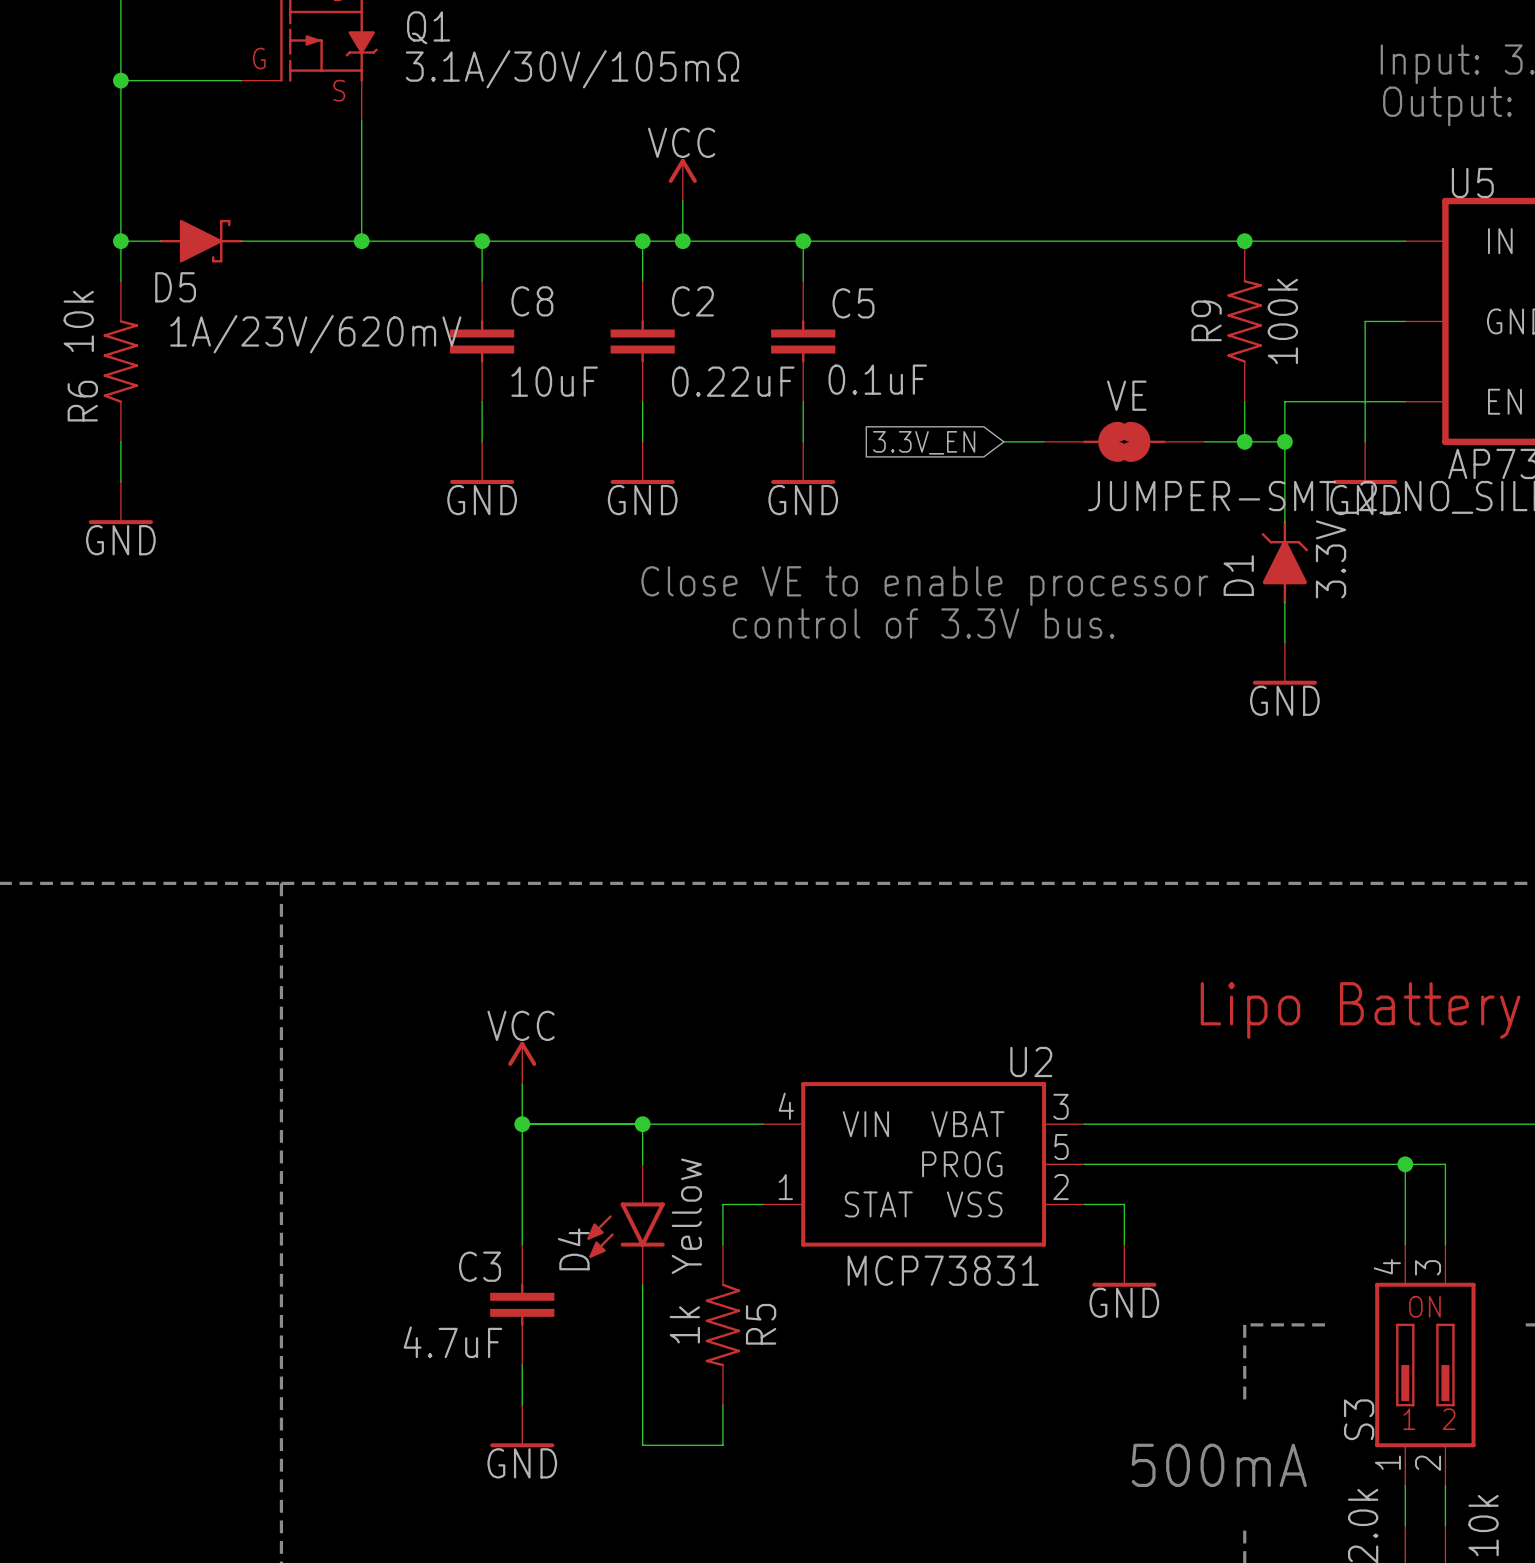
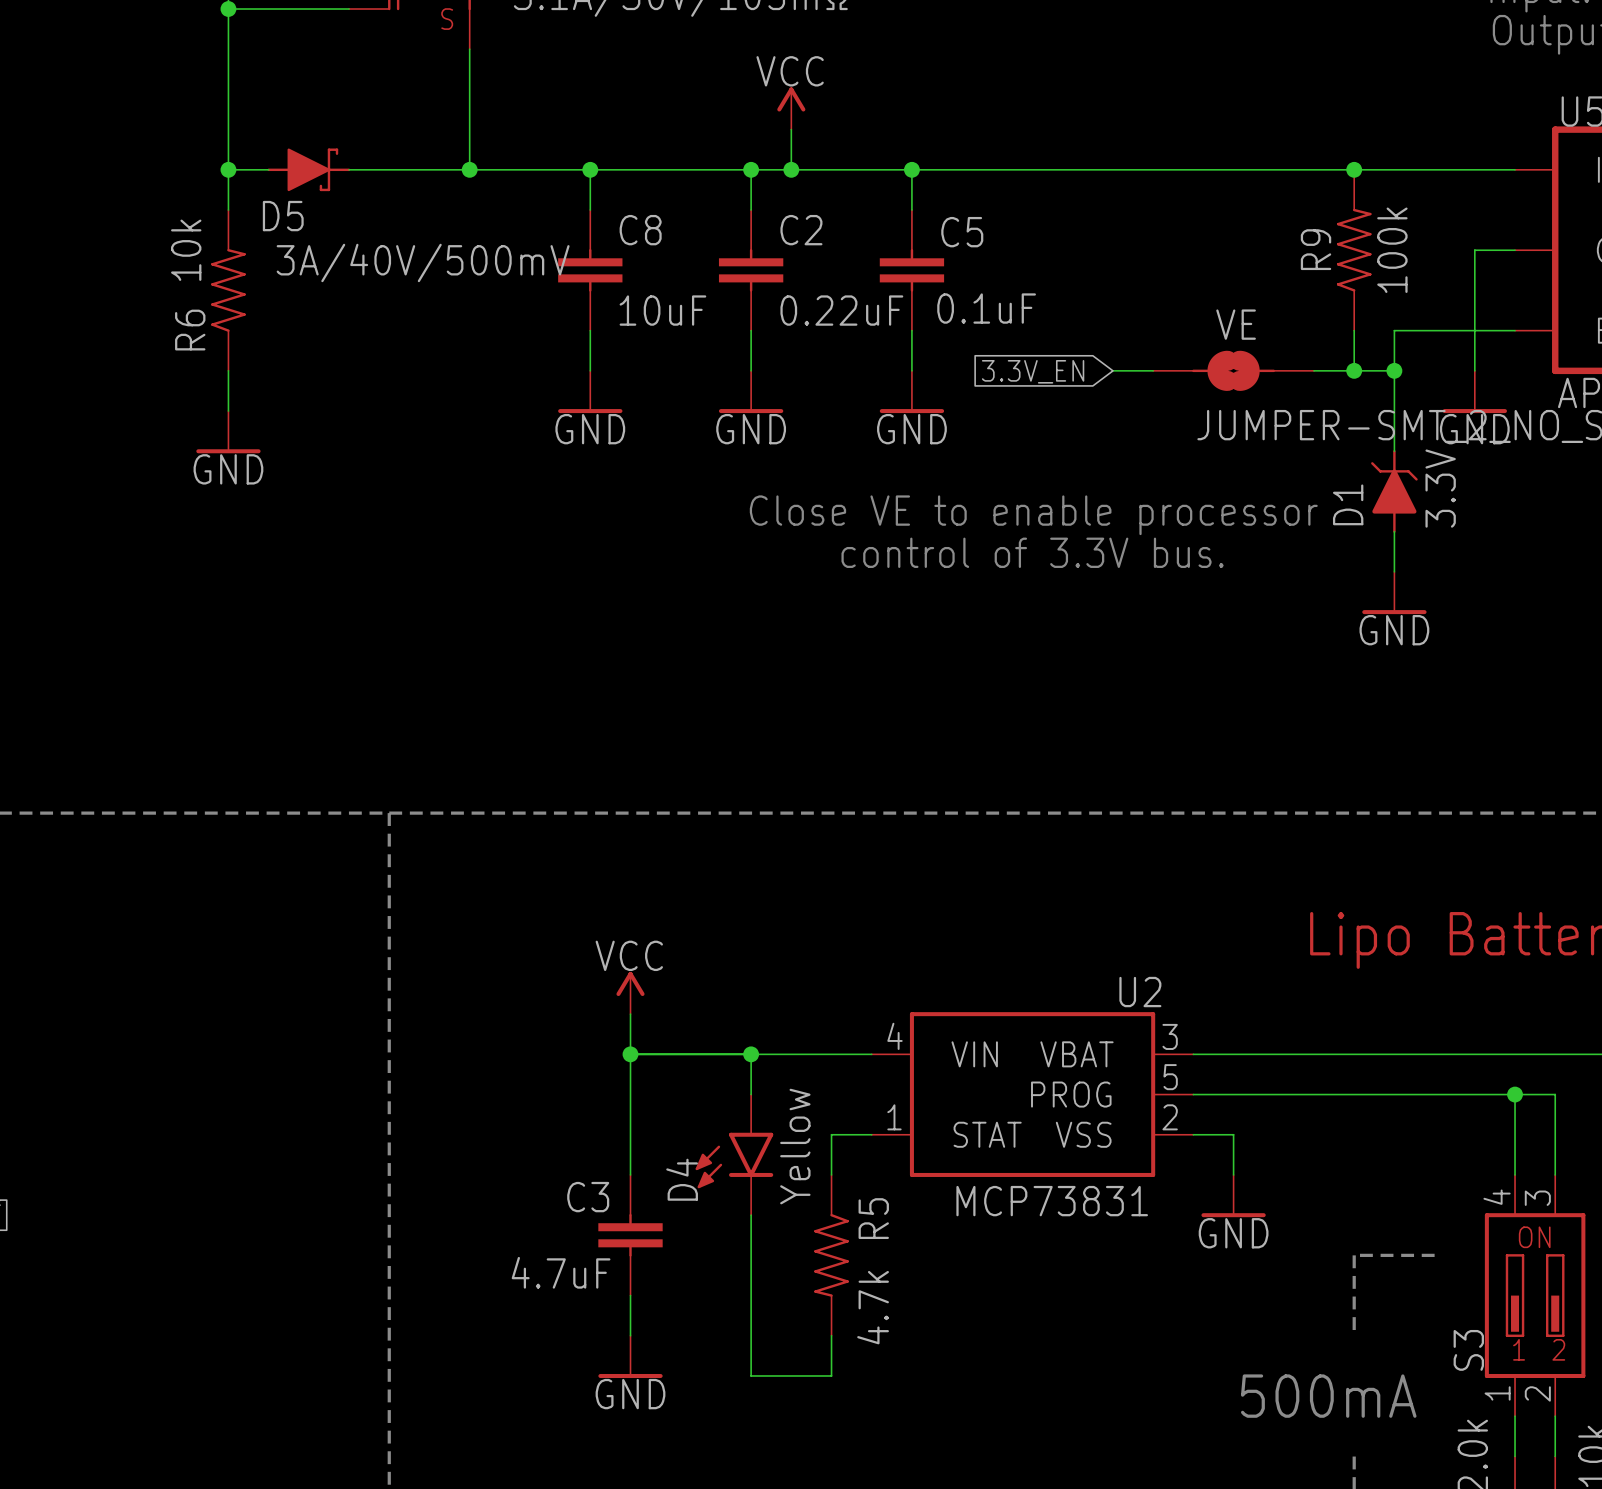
D5 value: 1A/23V/620mV (315, 334) -> 3A/40V/500mV (423, 262)
R5 value: 1k (684, 1324) -> 4.7k (873, 1307)
R5 name position: R5 (761, 1324) -> R5 (873, 1218)

